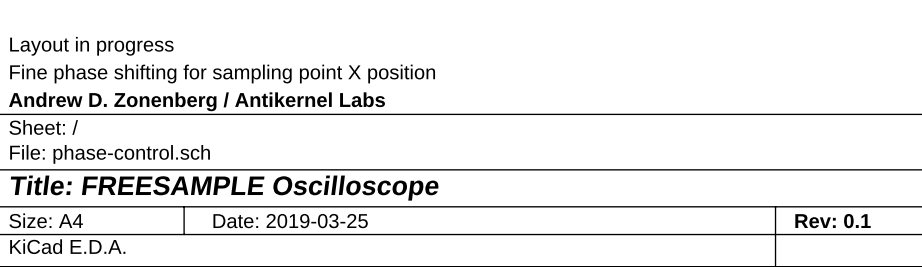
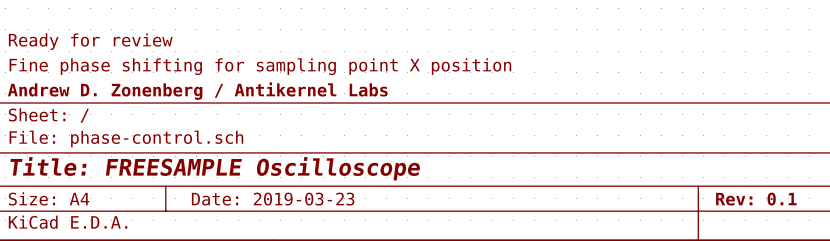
title block: Layout in progress (91, 46) -> Ready for review (90, 41)
title block: Date: 2019-03-25 (290, 221) -> Date: 2019-03-23 (273, 199)

